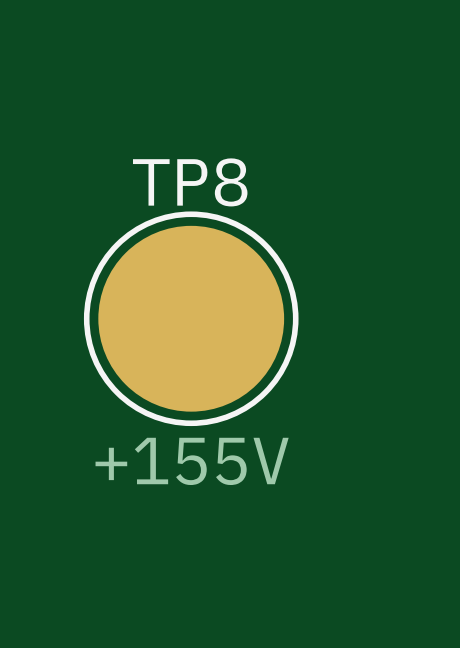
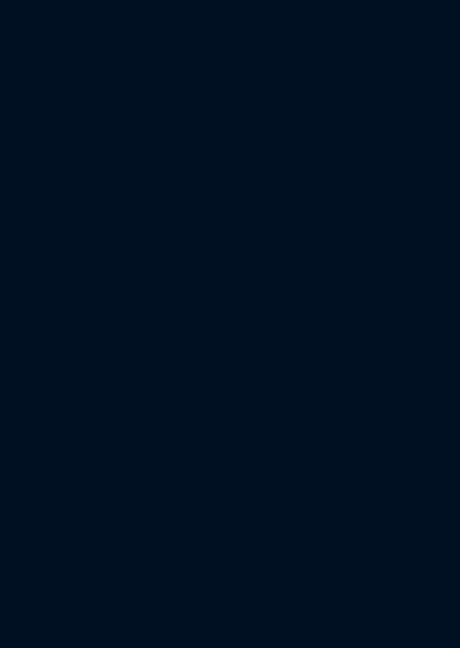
TP8: +155V (191, 318) -> none

